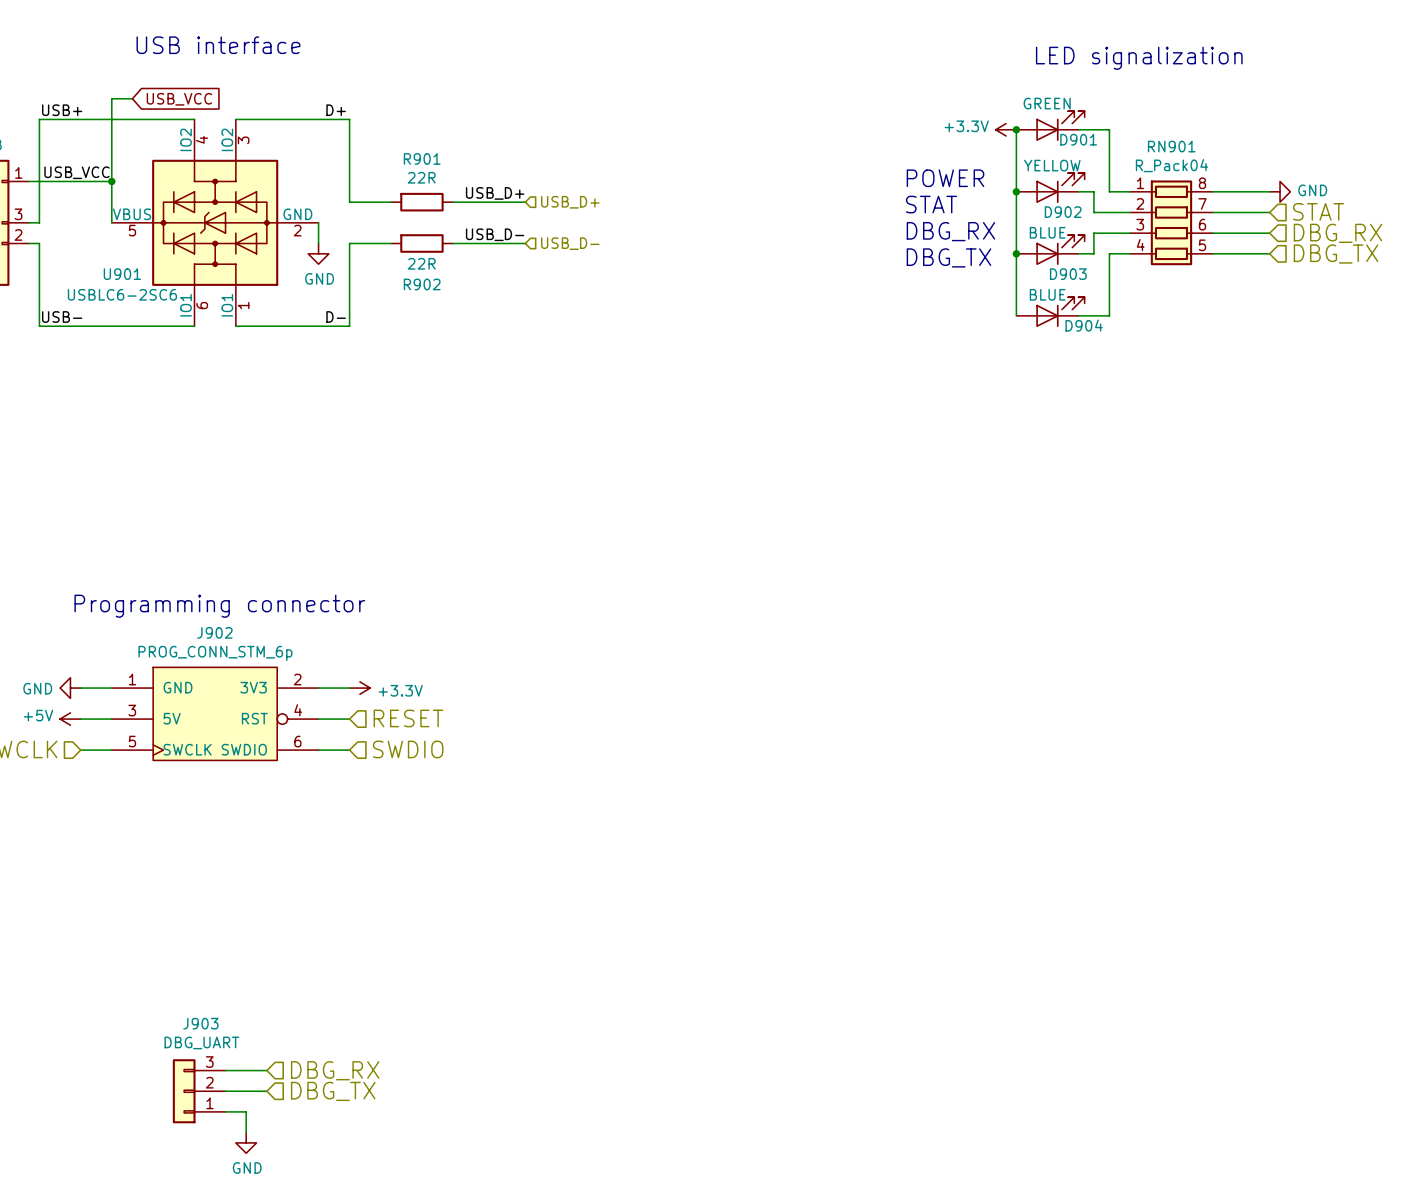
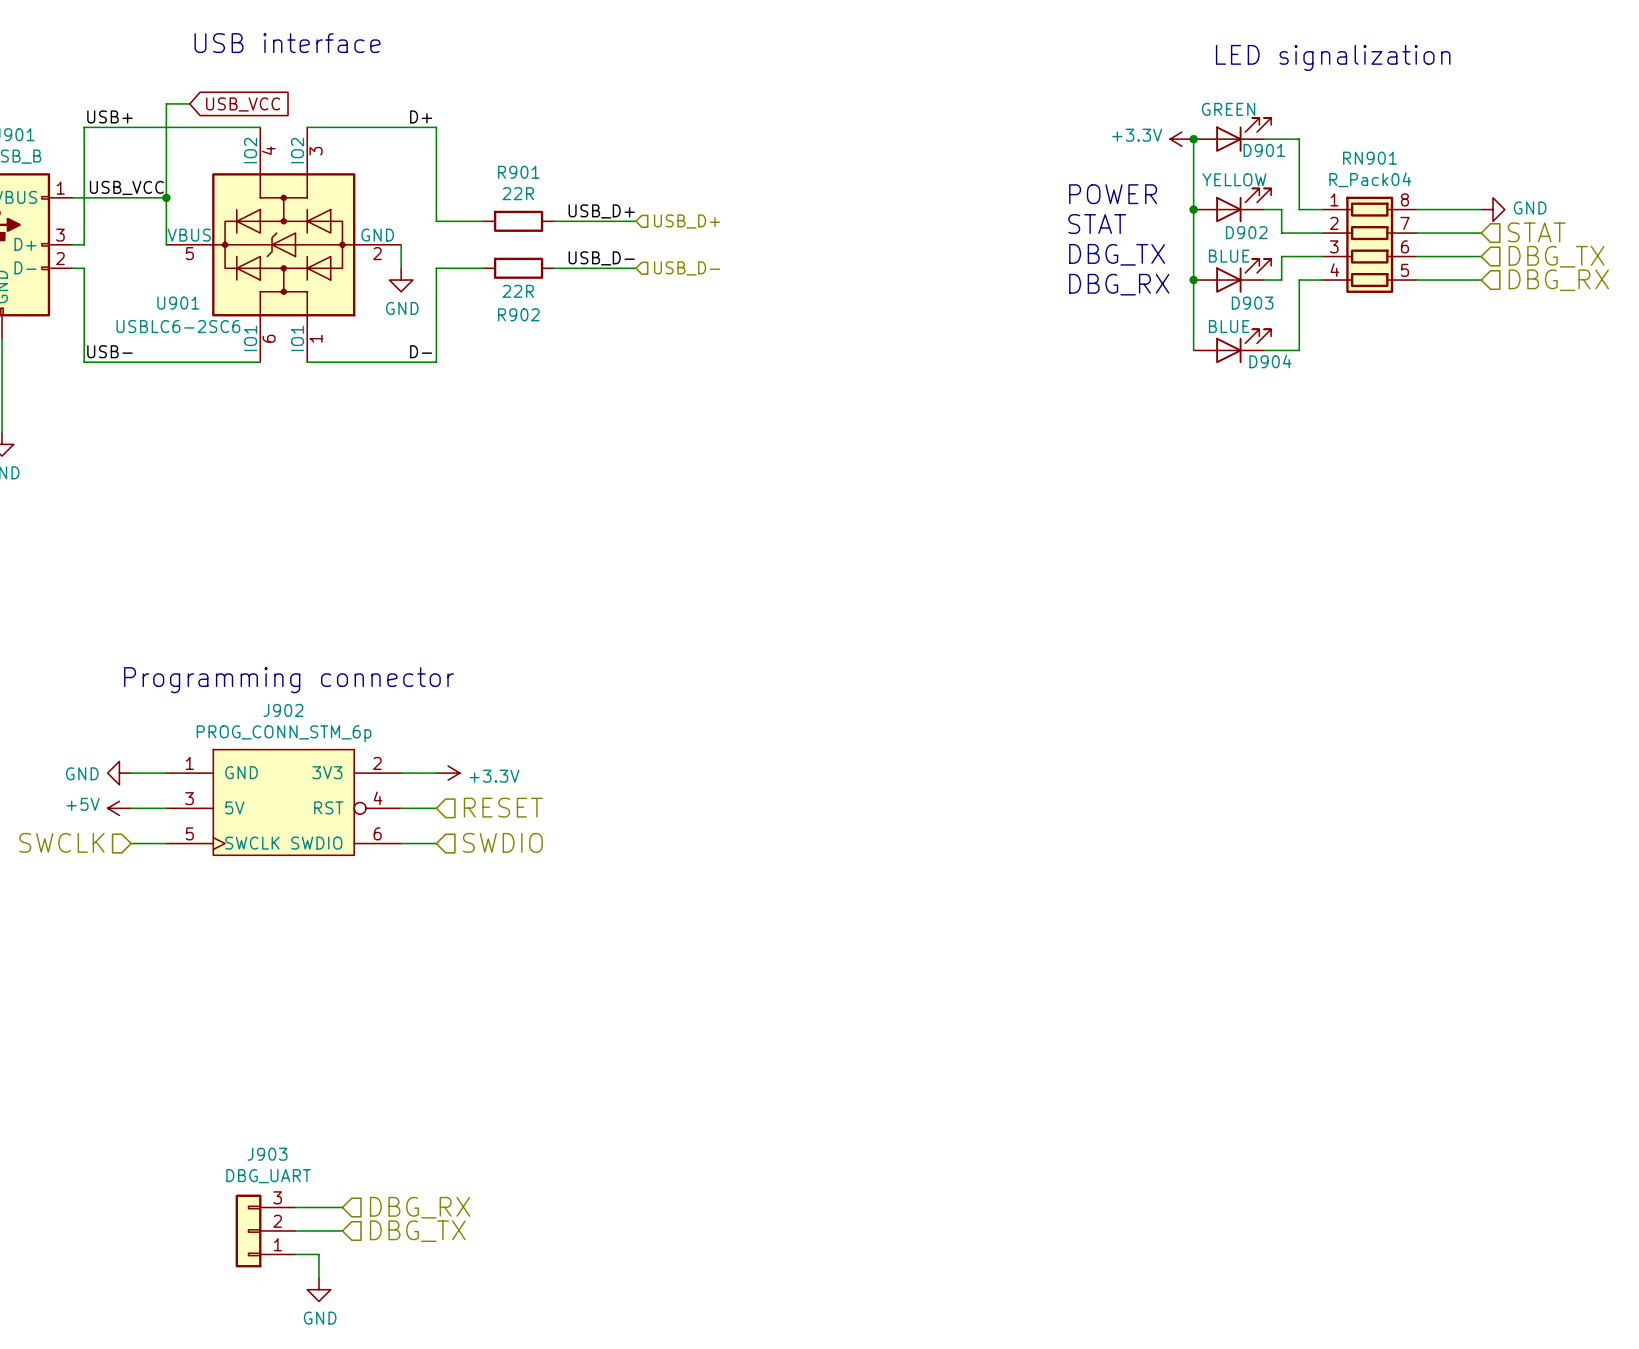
text: DBG_RX (950, 231) -> DBG_TX (1117, 254)
hierarchical label: DBG_RX (1337, 233) -> DBG_TX (1556, 256)
hierarchical label: DBG_TX (1336, 254) -> DBG_RX (1558, 280)
text: DBG_TX (949, 257) -> DBG_RX (1119, 284)

